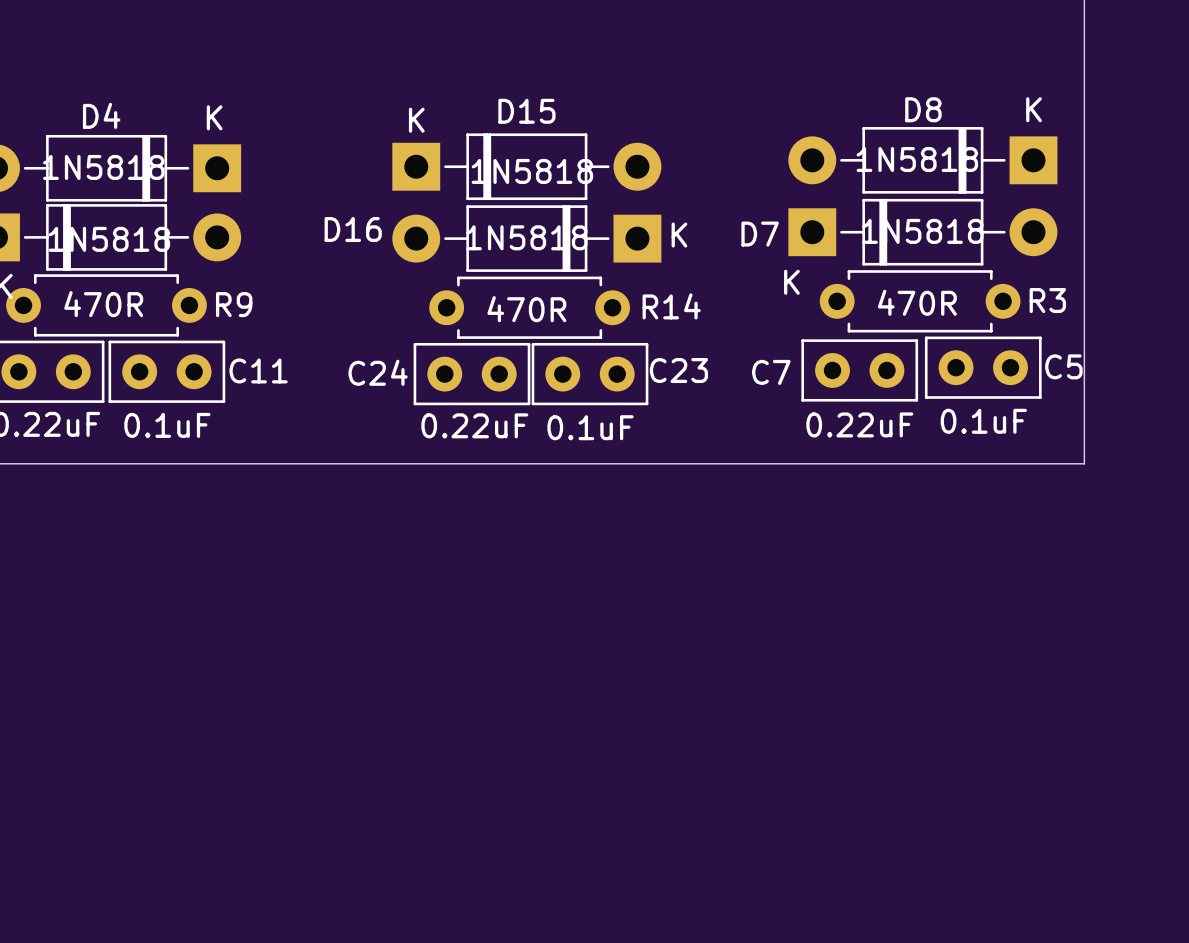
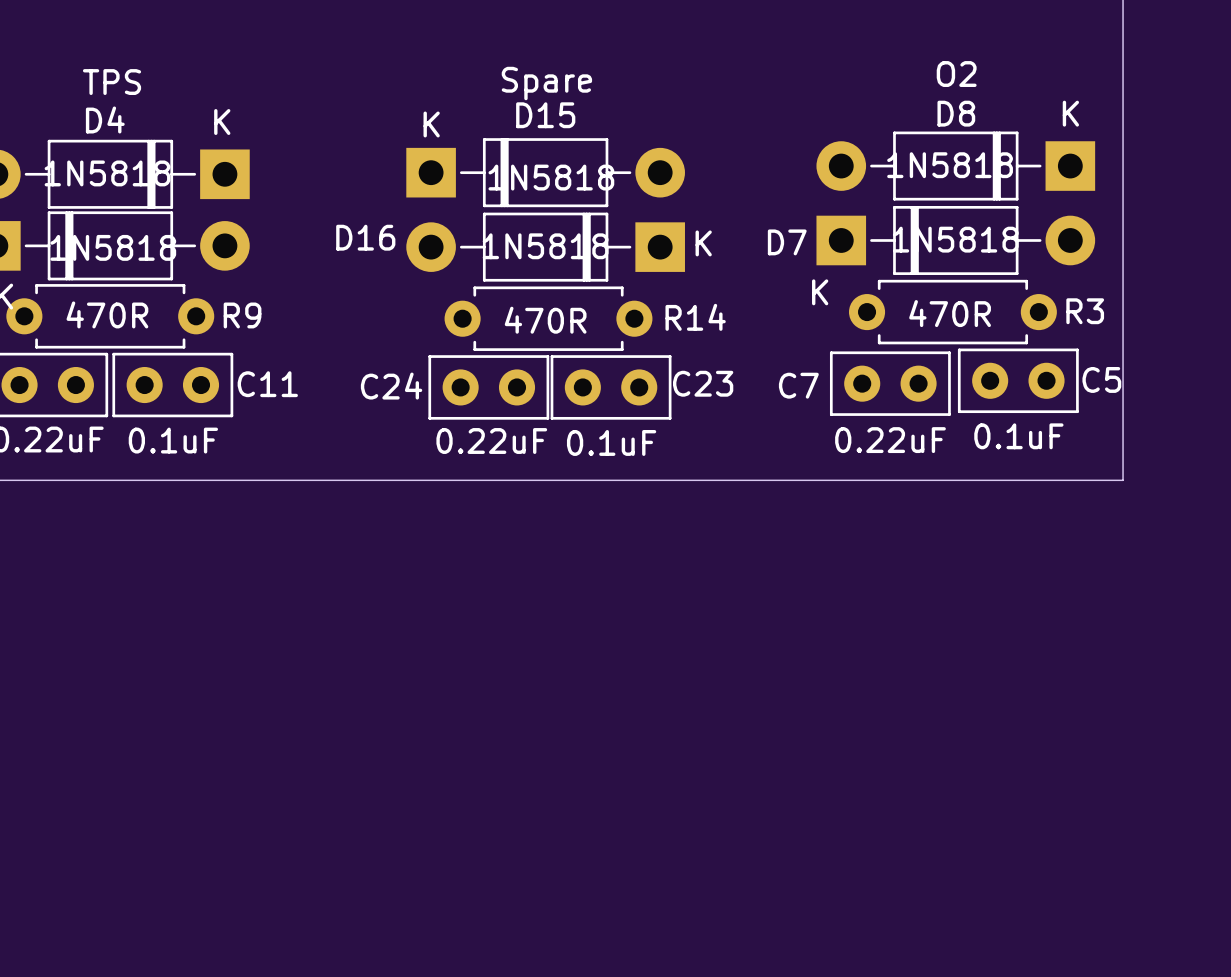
text: none -> O2 (956, 74)
text: none -> TPS (112, 82)
text: none -> Spare (546, 83)

